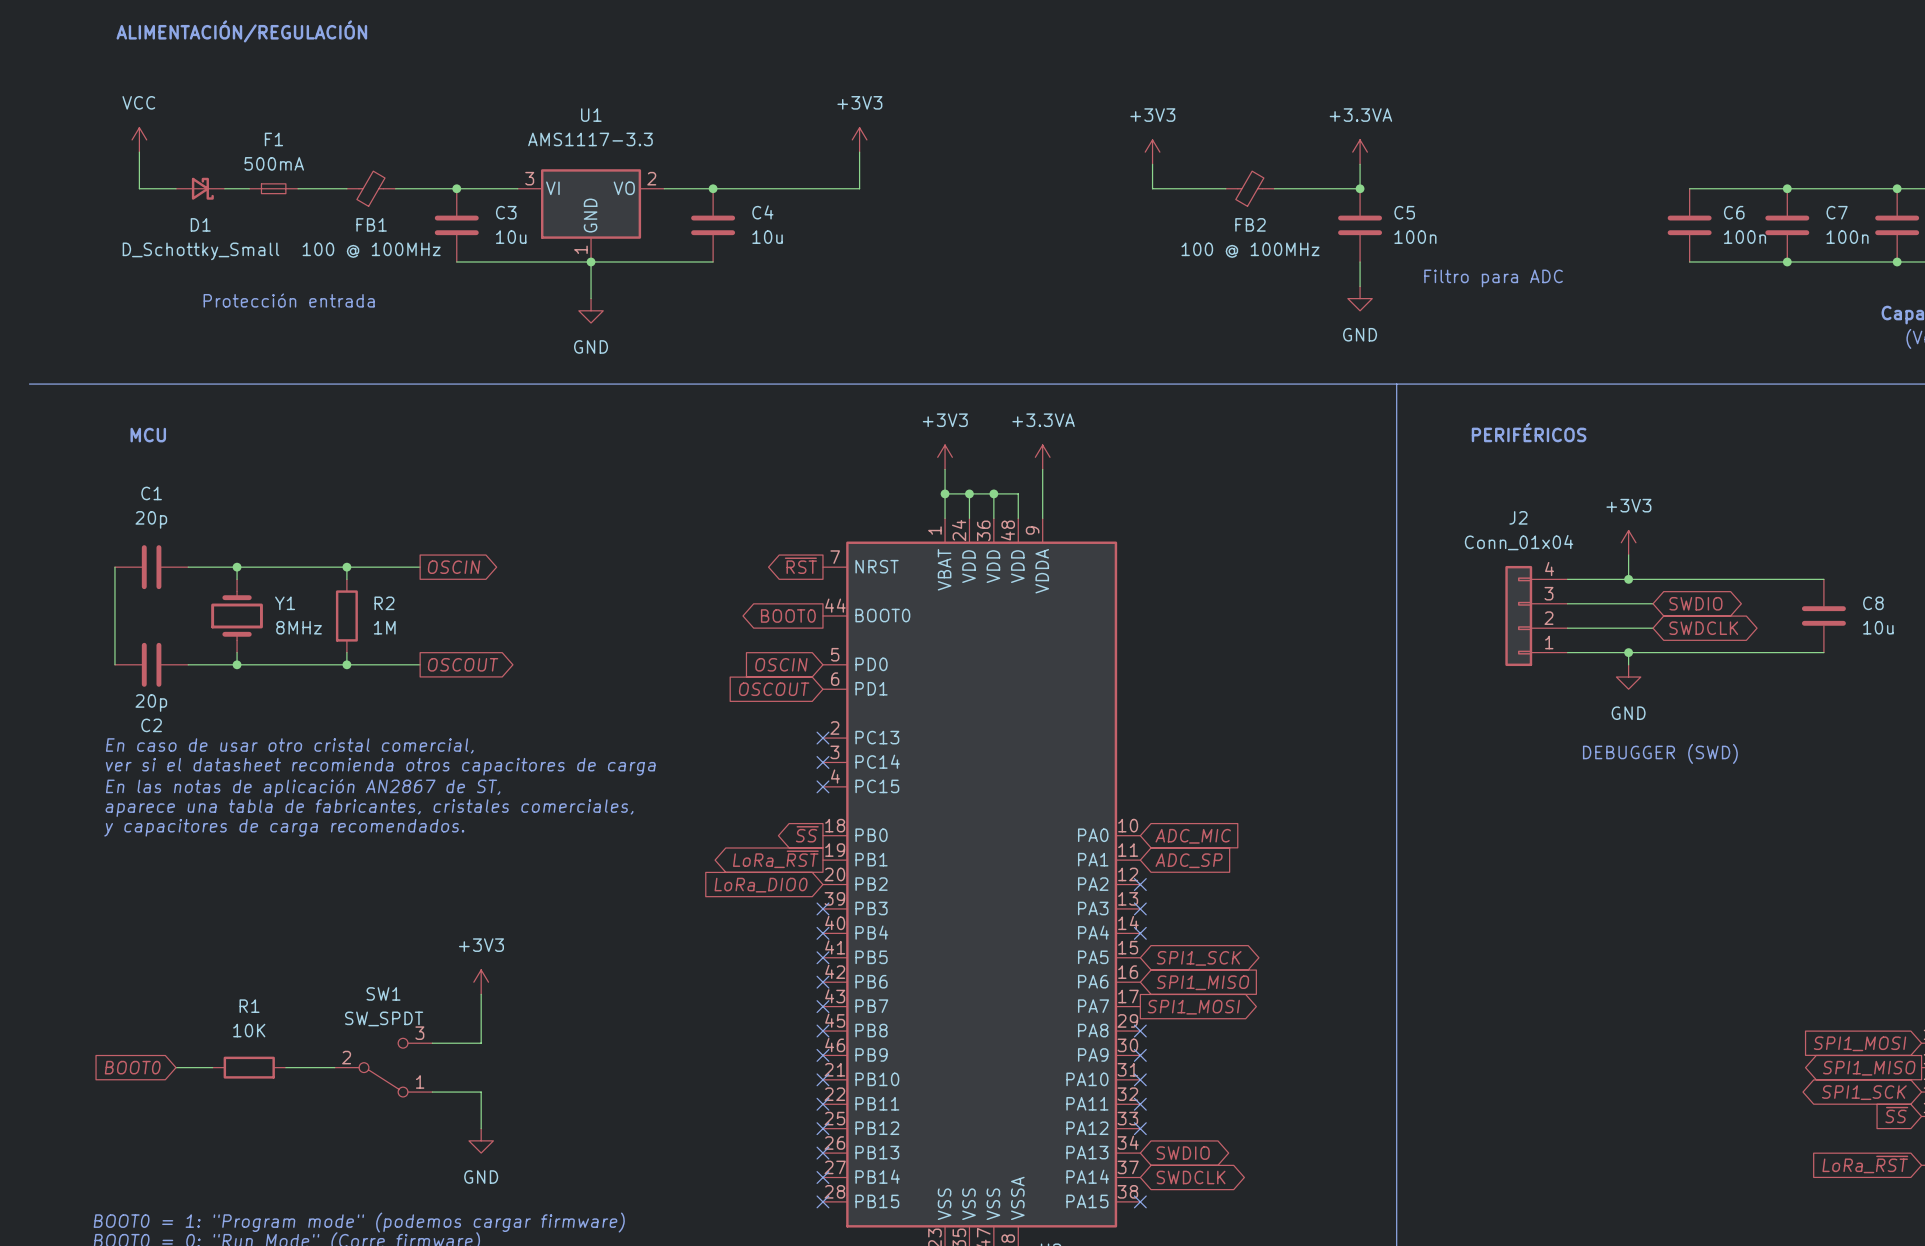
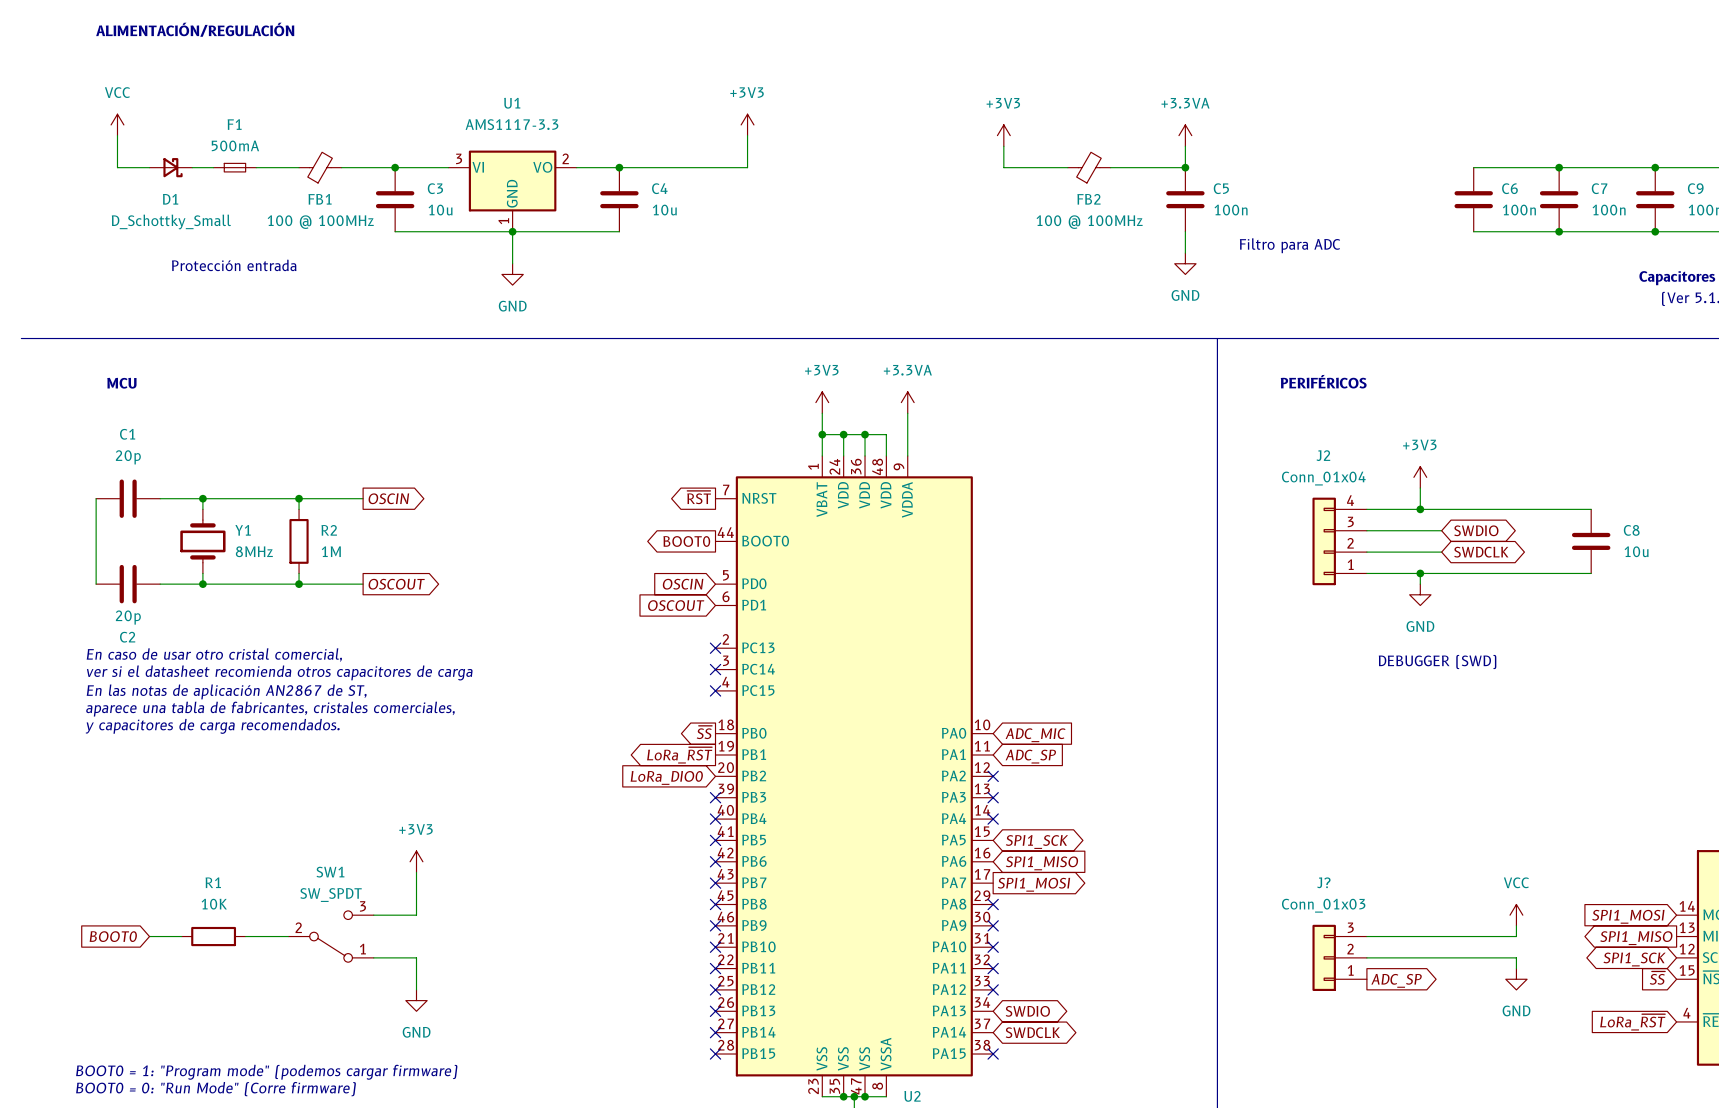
power symbol: none -> VCC (1516, 915)
wire: none -> (1516, 925) (1516, 936) (1366, 936)
J?: none -> Conn_01x03 (1339, 957)
wire: none -> (1366, 957) (1516, 957) (1516, 968)
power symbol: none -> GND (1516, 979)
global label: none -> ADC_SP (1396, 980)

